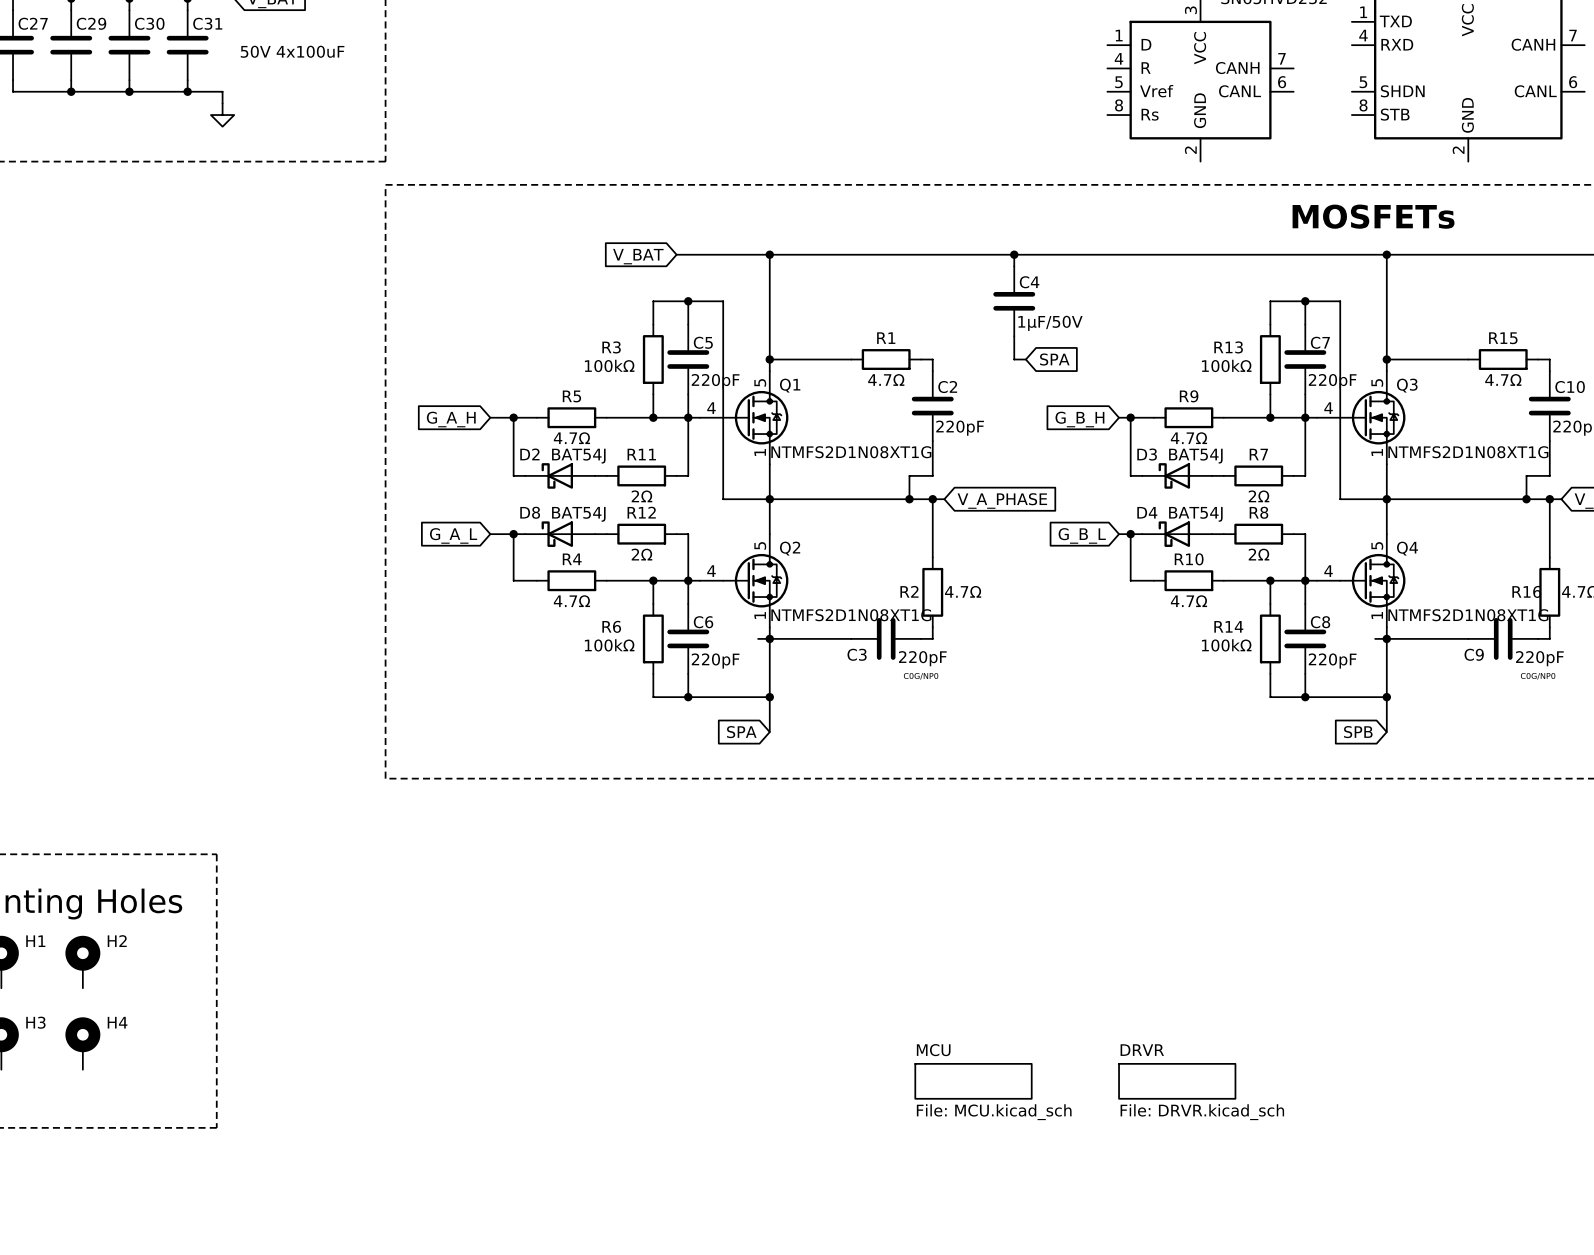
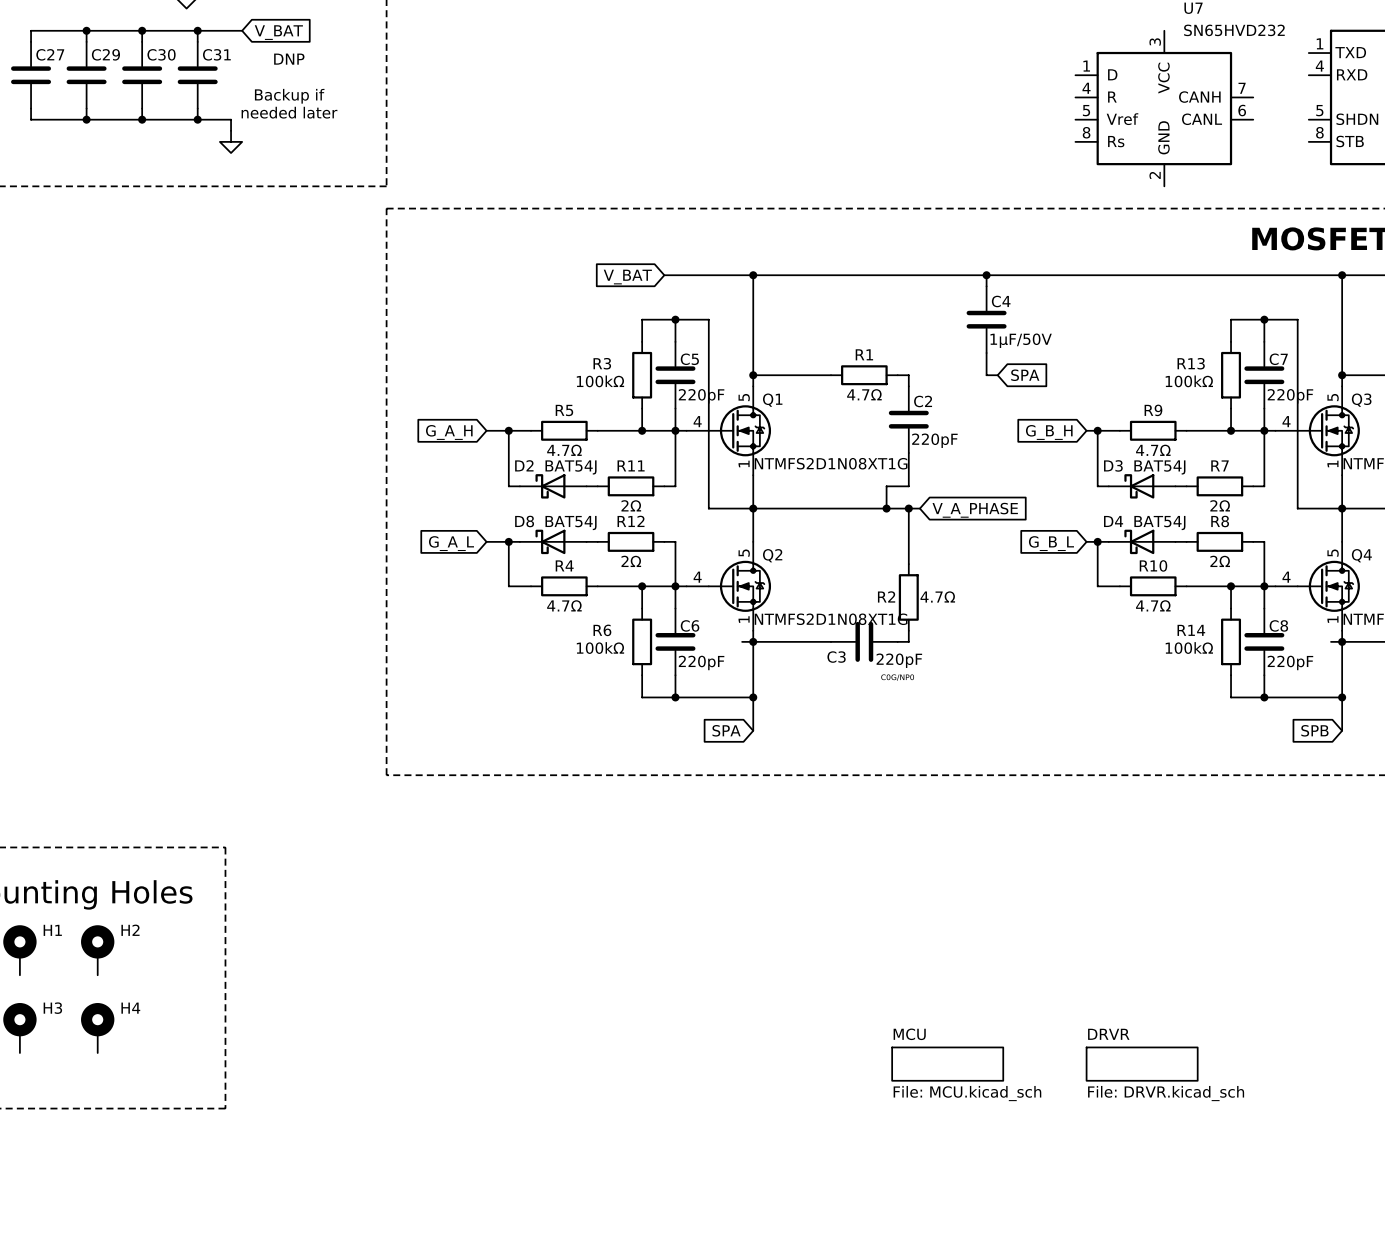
text: none -> DNP (289, 59)
text: 50V 4x100uF (292, 51) -> none
text: none -> Backup if (289, 96)
text: none -> needed later (289, 112)

